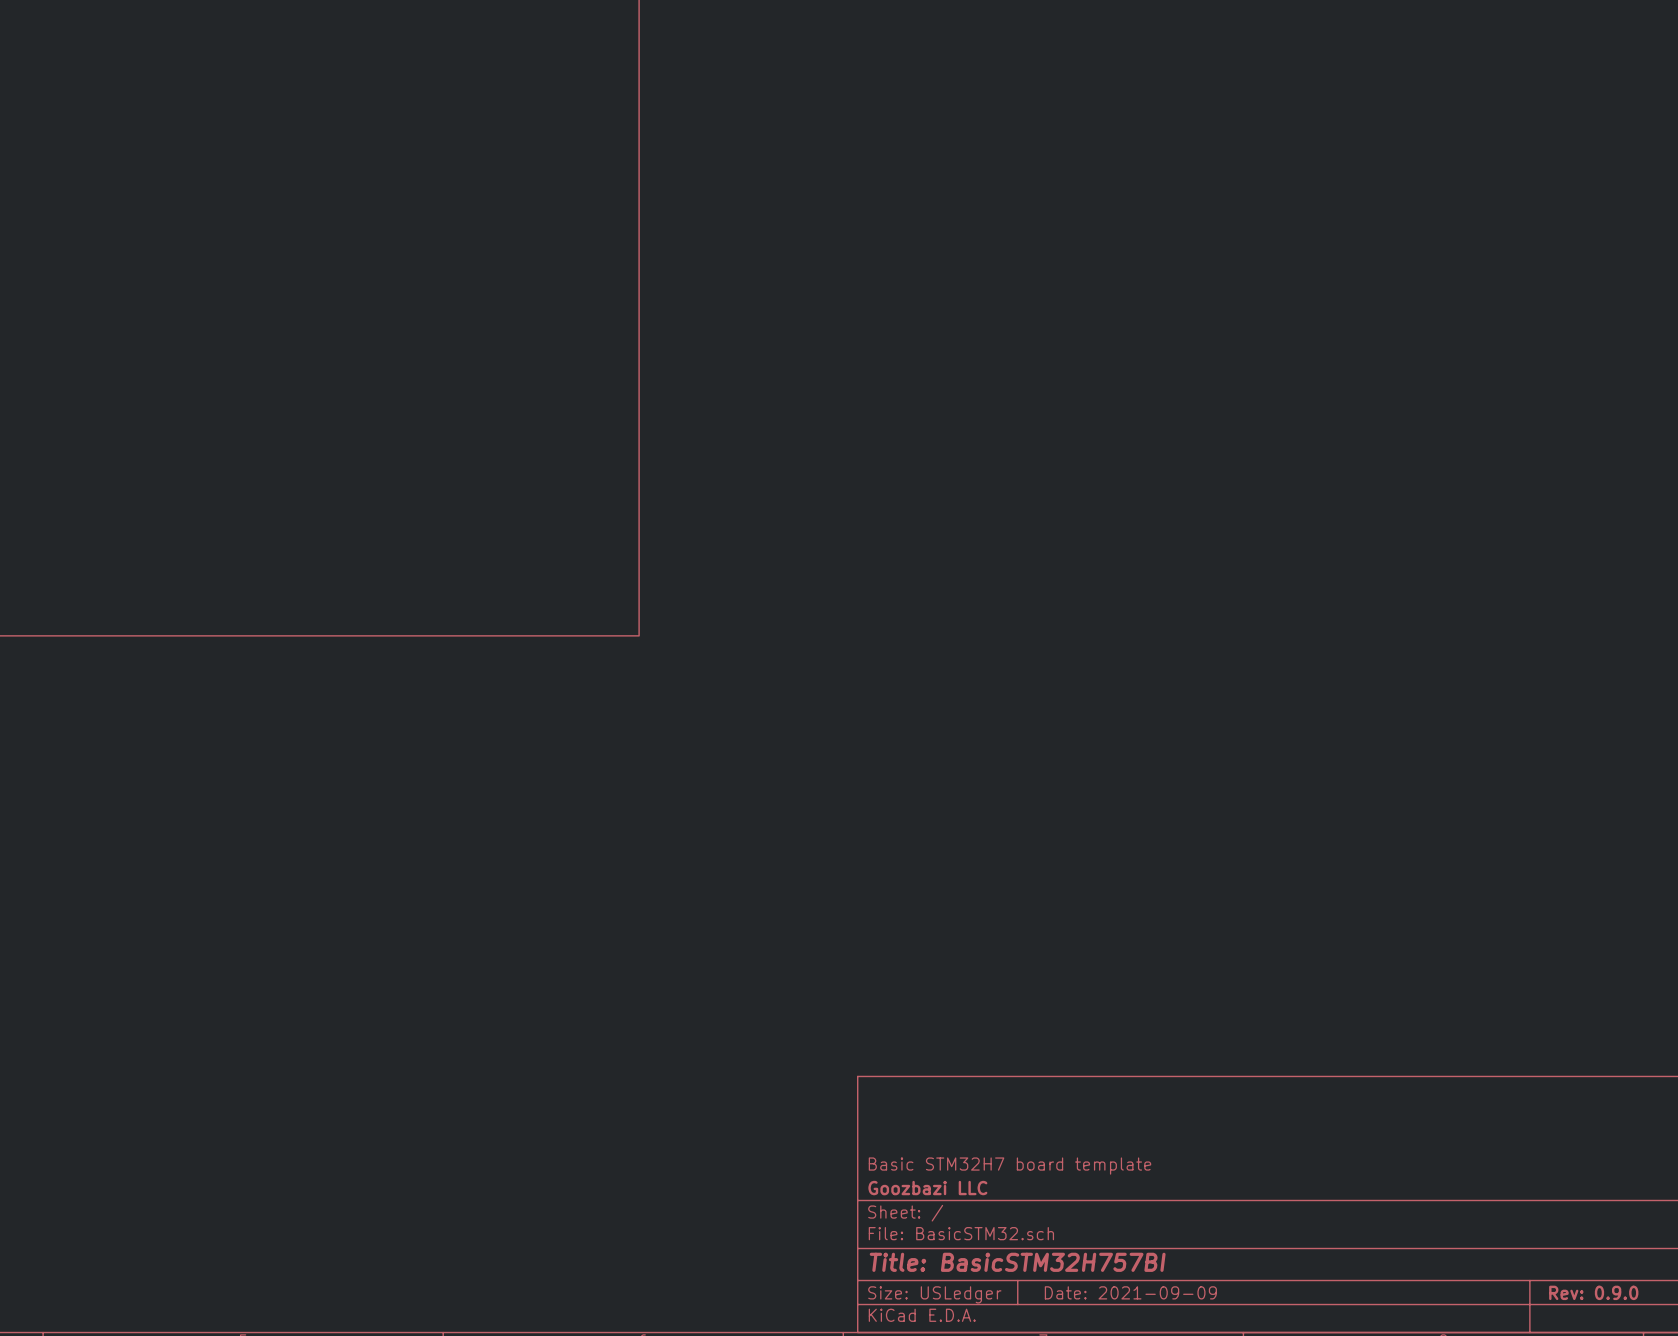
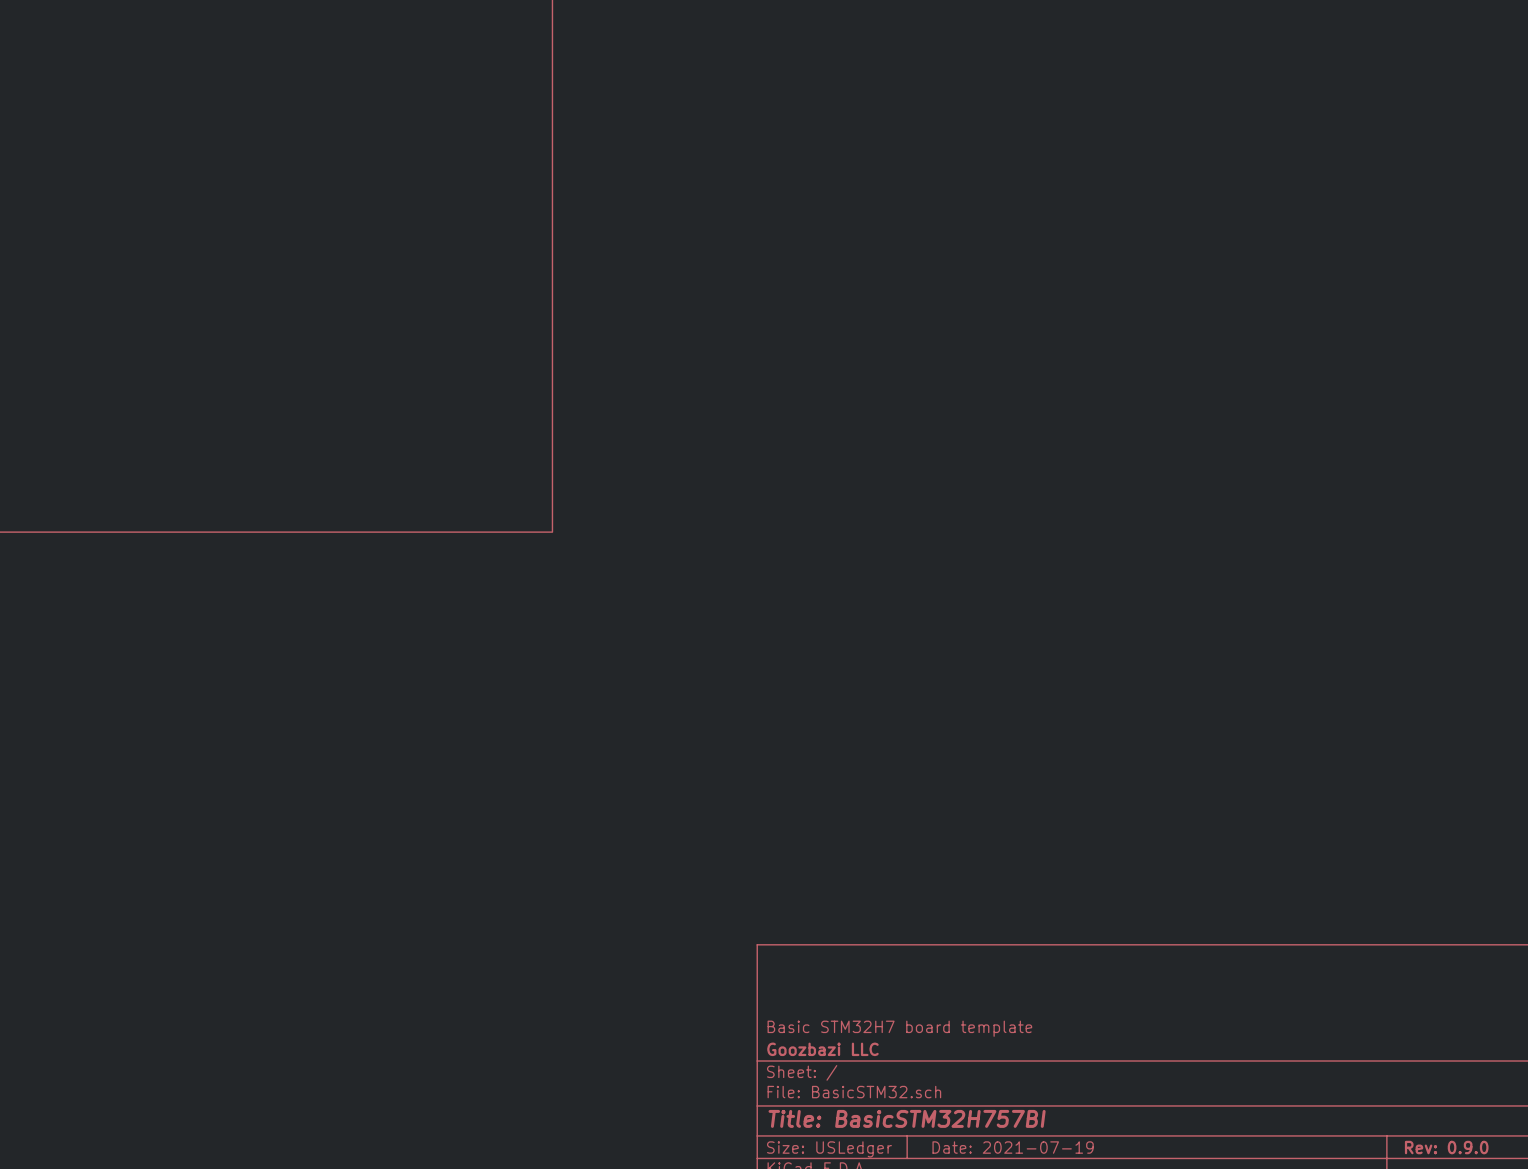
title block: Date: 2021-09-09 (1130, 1292) -> Date: 2021-07-19 (1013, 1147)

